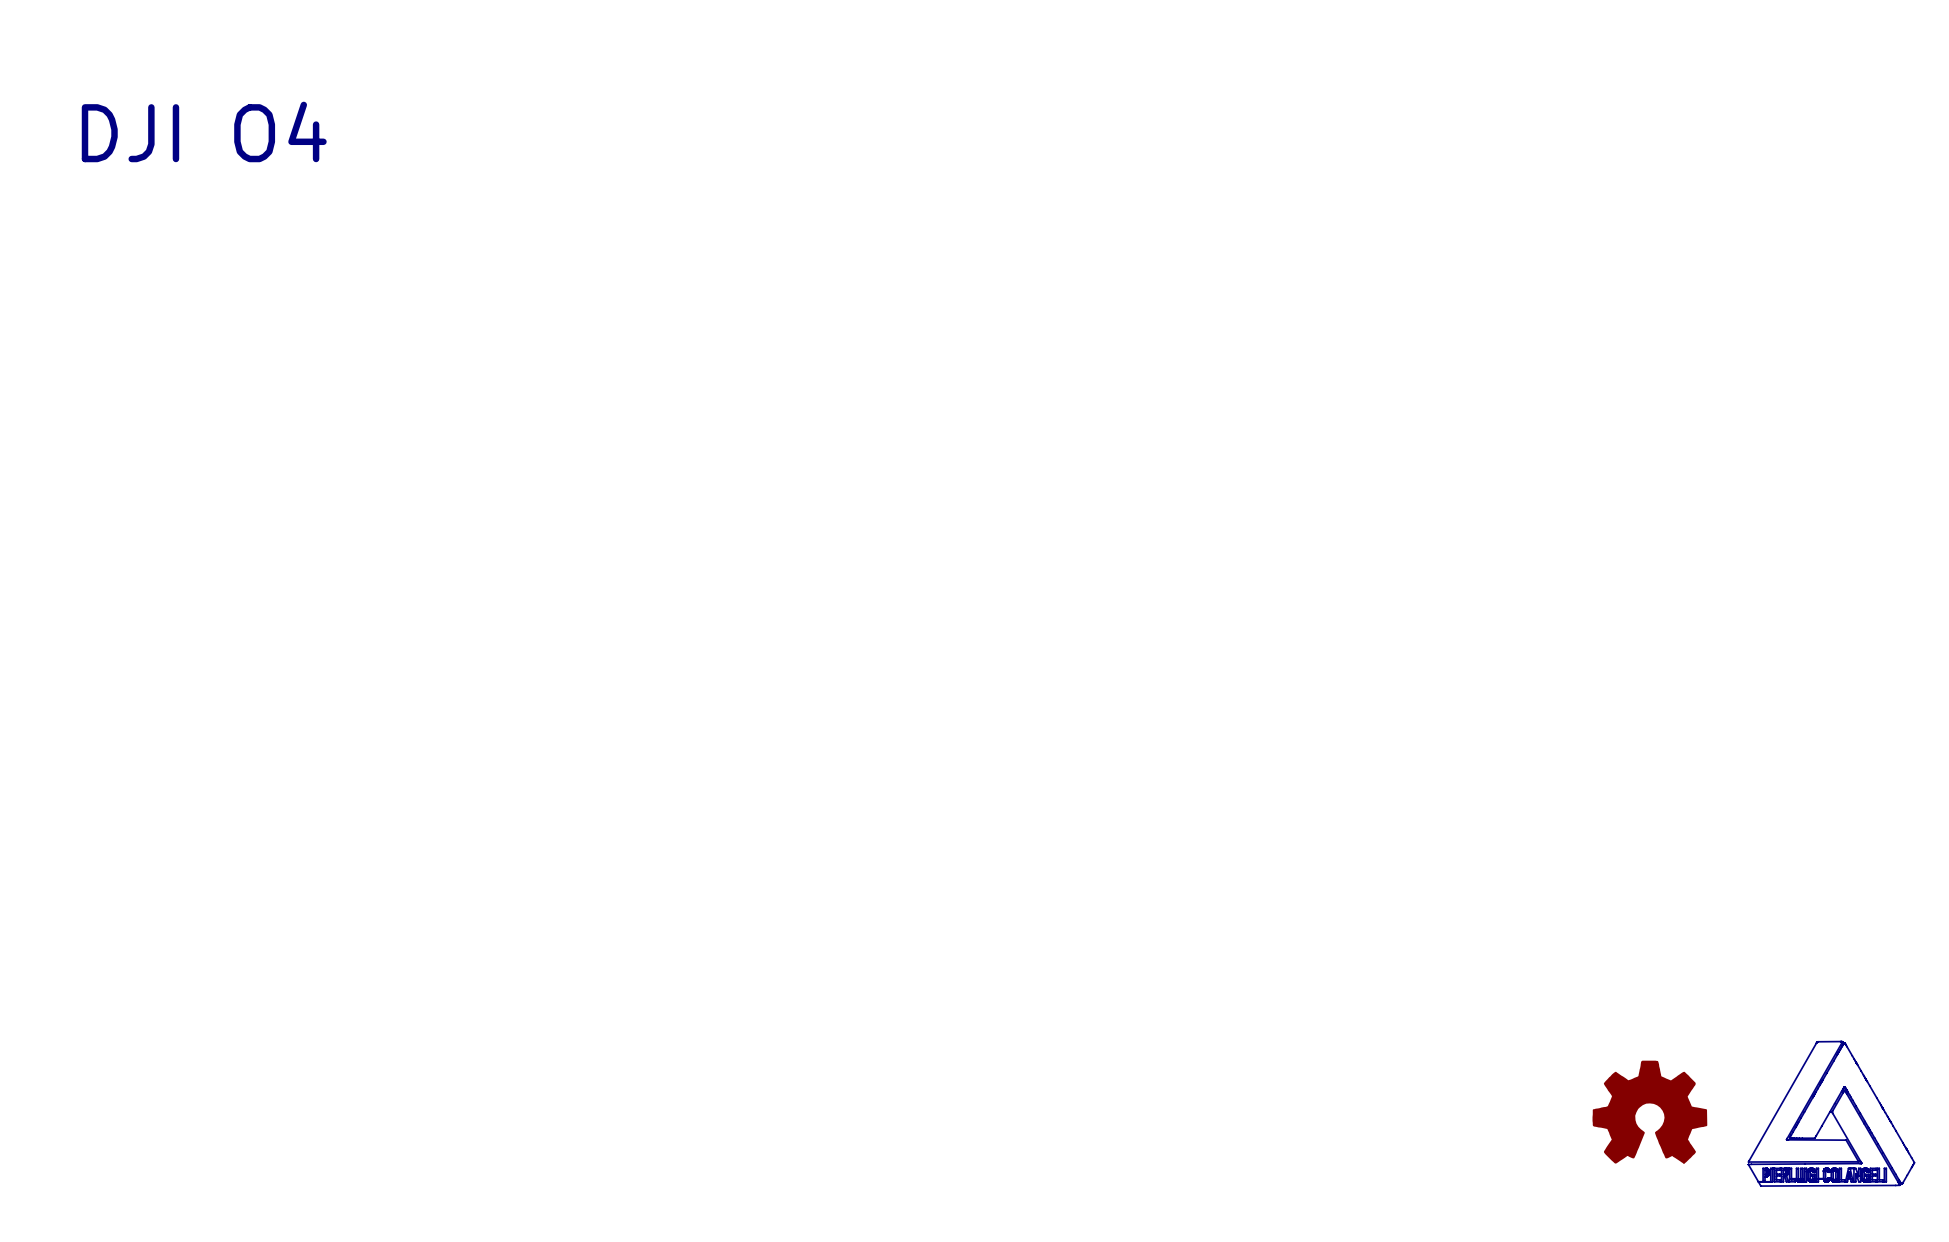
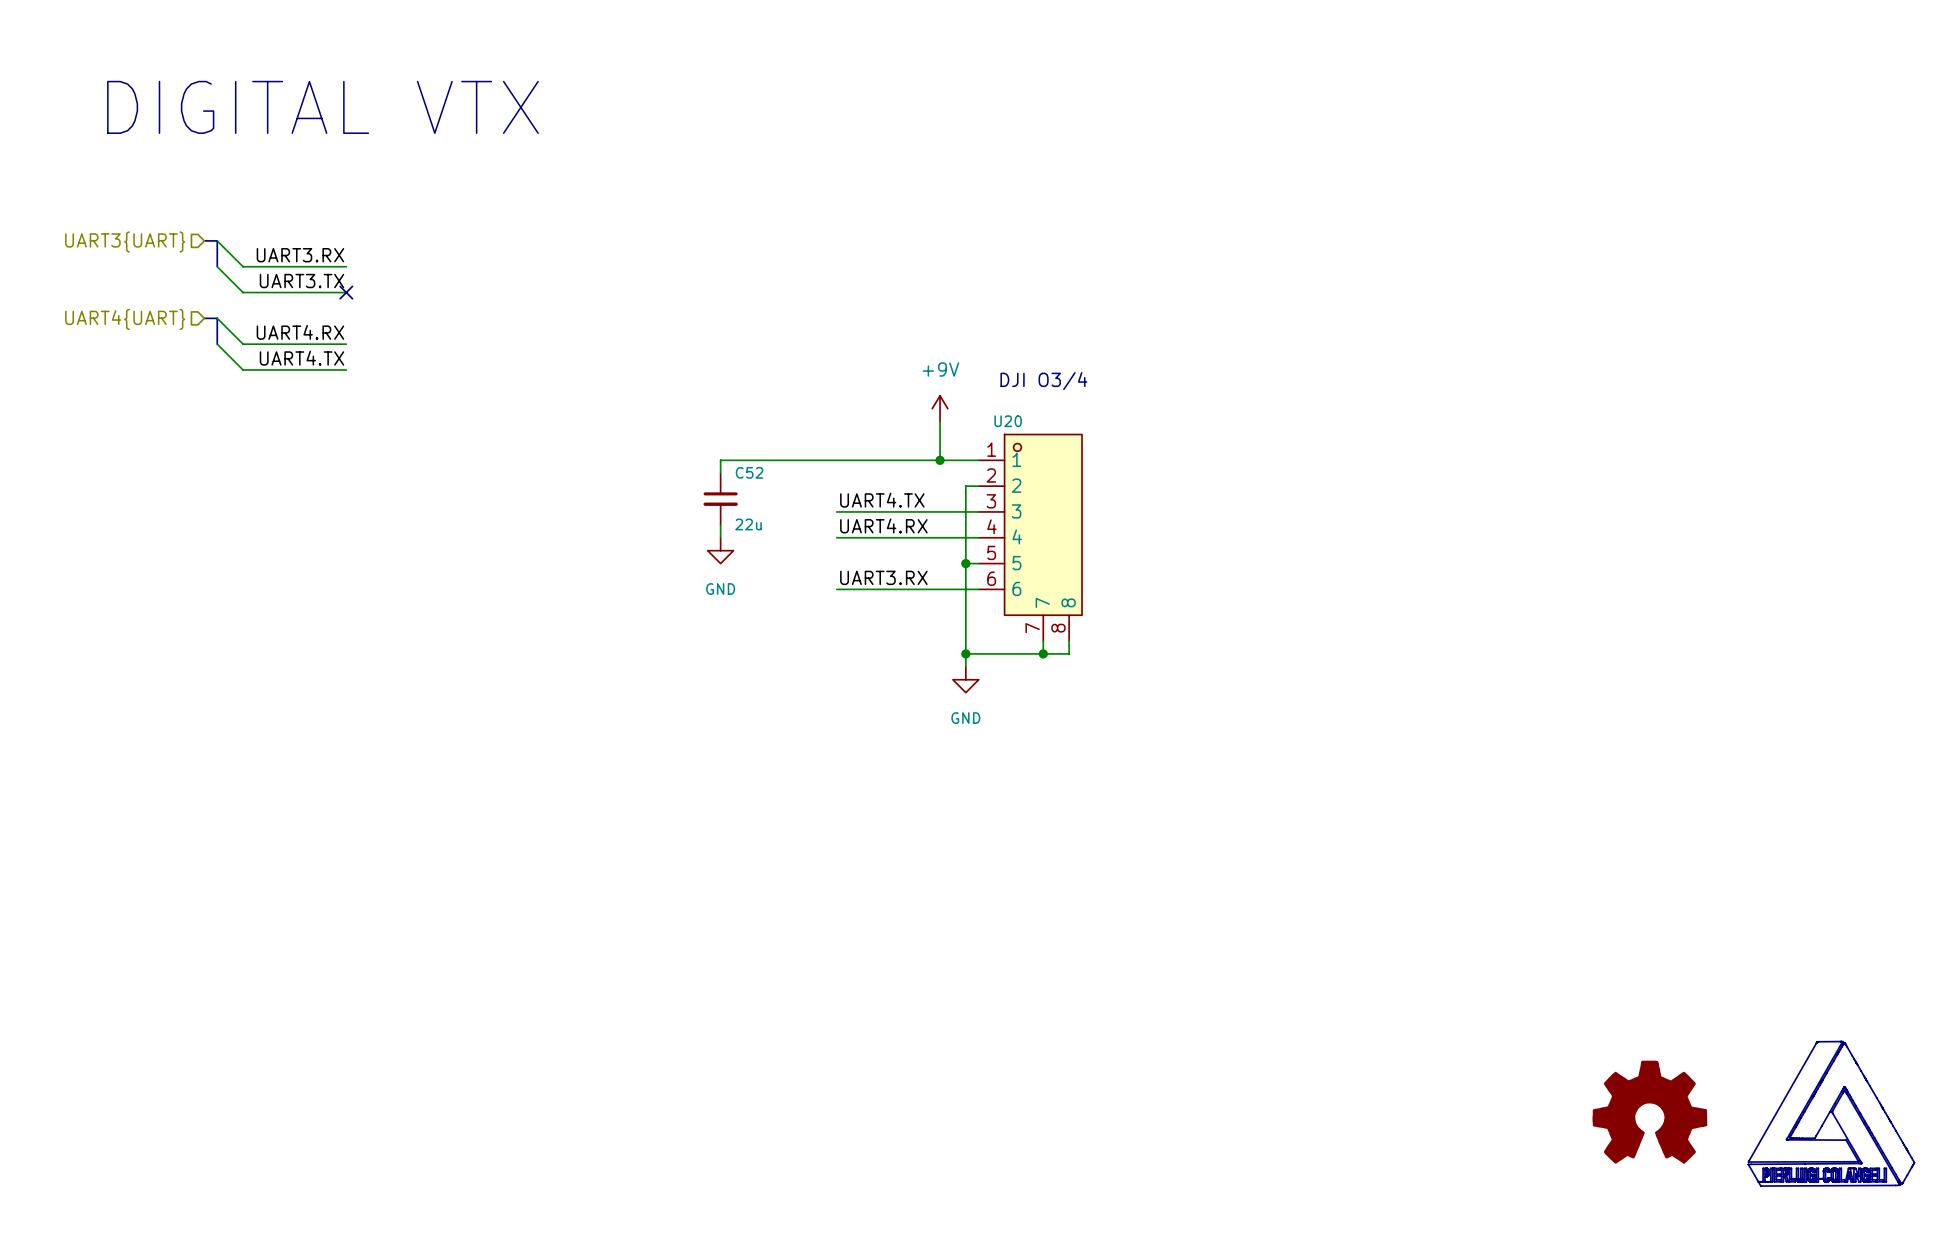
text: none -> DIGITAL VTX (322, 107)
text: DJI O4 (204, 131) -> none
bus: none -> (204, 240) (217, 240) (217, 266)
wire: none -> (217, 240) (243, 266) (346, 266)
hierarchical label: none -> UART3{UART} (125, 241)
label: none -> UART3.RX (300, 255)
wire: none -> (217, 266) (243, 292) (346, 292)
label: none -> UART3.TX (301, 281)
no-connect mark: none -> (346, 292)
bus: none -> (204, 318) (217, 318) (217, 344)
wire: none -> (217, 318) (243, 344) (346, 344)
hierarchical label: none -> UART4{UART} (125, 319)
label: none -> UART4.RX (300, 332)
wire: none -> (217, 344) (243, 369) (346, 369)
label: none -> UART4.TX (301, 358)
text: none -> DJI O3/4 (1043, 381)
power symbol: none -> +9V (940, 408)
wire: none -> (940, 421) (940, 460)
junction: none -> (940, 460)
wire: none -> (978, 460) (720, 460) (720, 473)
wire: none -> (978, 486) (965, 486) (965, 666)
C52: none -> 22u (720, 499)
label: none -> UART4.TX (882, 500)
wire: none -> (836, 511) (978, 511)
wire: none -> (720, 524) (720, 537)
label: none -> UART4.RX (883, 525)
wire: none -> (836, 537) (978, 537)
U20: none -> (1030, 537)
power symbol: none -> GND (720, 550)
wire: none -> (965, 563) (978, 563)
junction: none -> (965, 563)
label: none -> UART3.RX (883, 577)
wire: none -> (836, 589) (978, 589)
wire: none -> (1043, 641) (1043, 653)
wire: none -> (1069, 641) (1069, 653) (965, 653)
junction: none -> (965, 653)
junction: none -> (1043, 653)
power symbol: none -> GND (965, 679)

